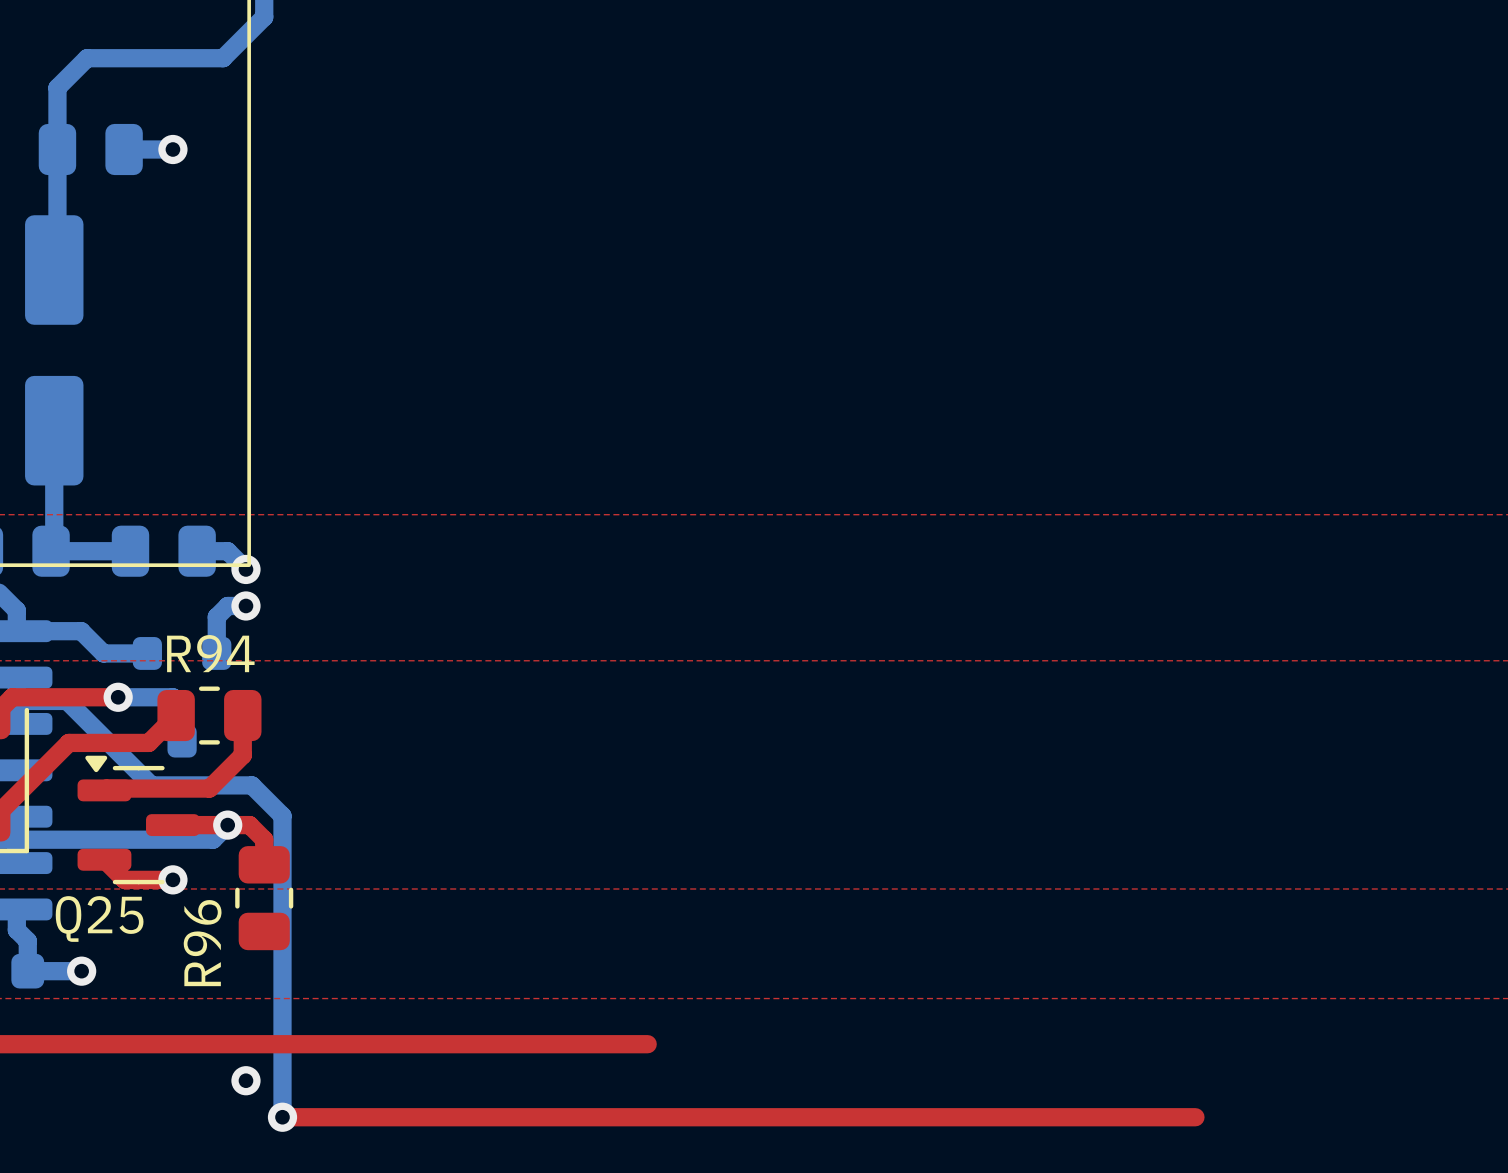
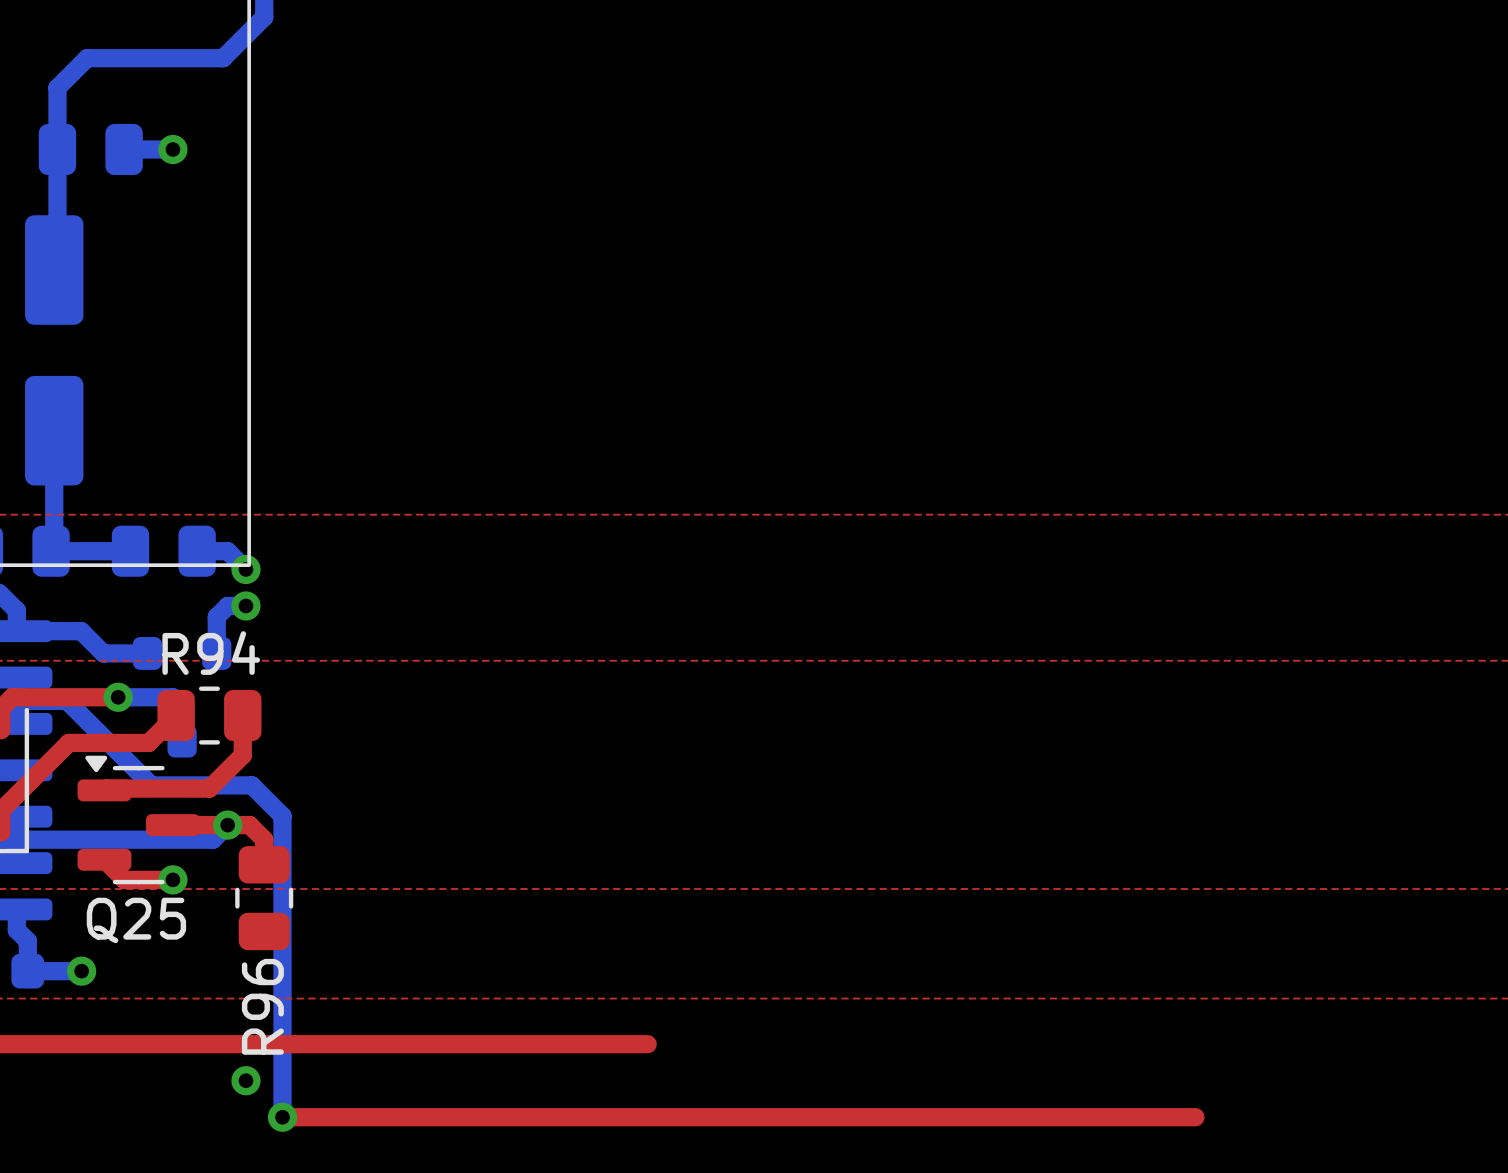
Q25 name position: Q25 (99, 919) -> Q25 (136, 920)
R96 name position: R96 (202, 943) -> R96 (262, 1006)

